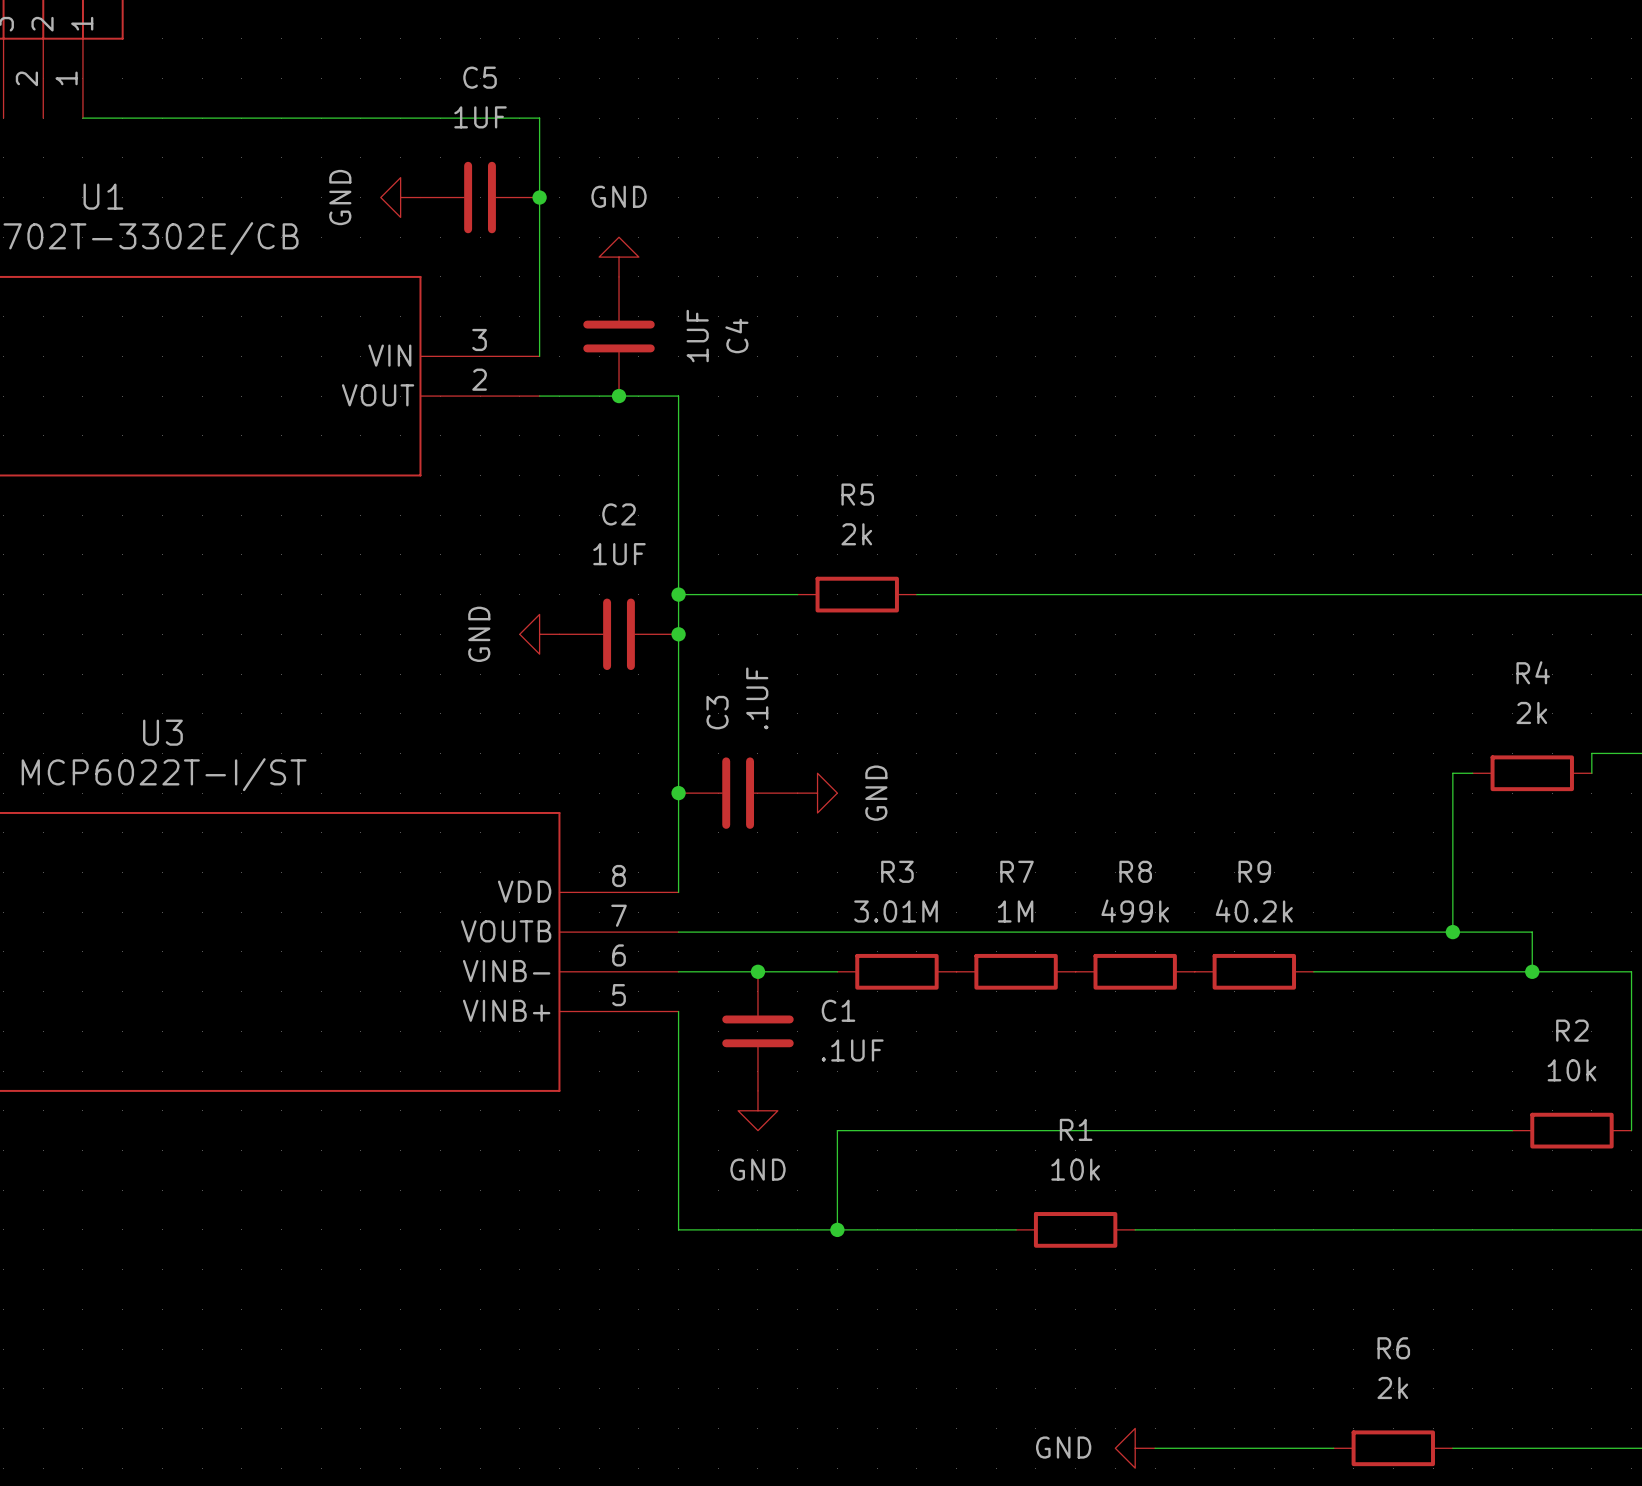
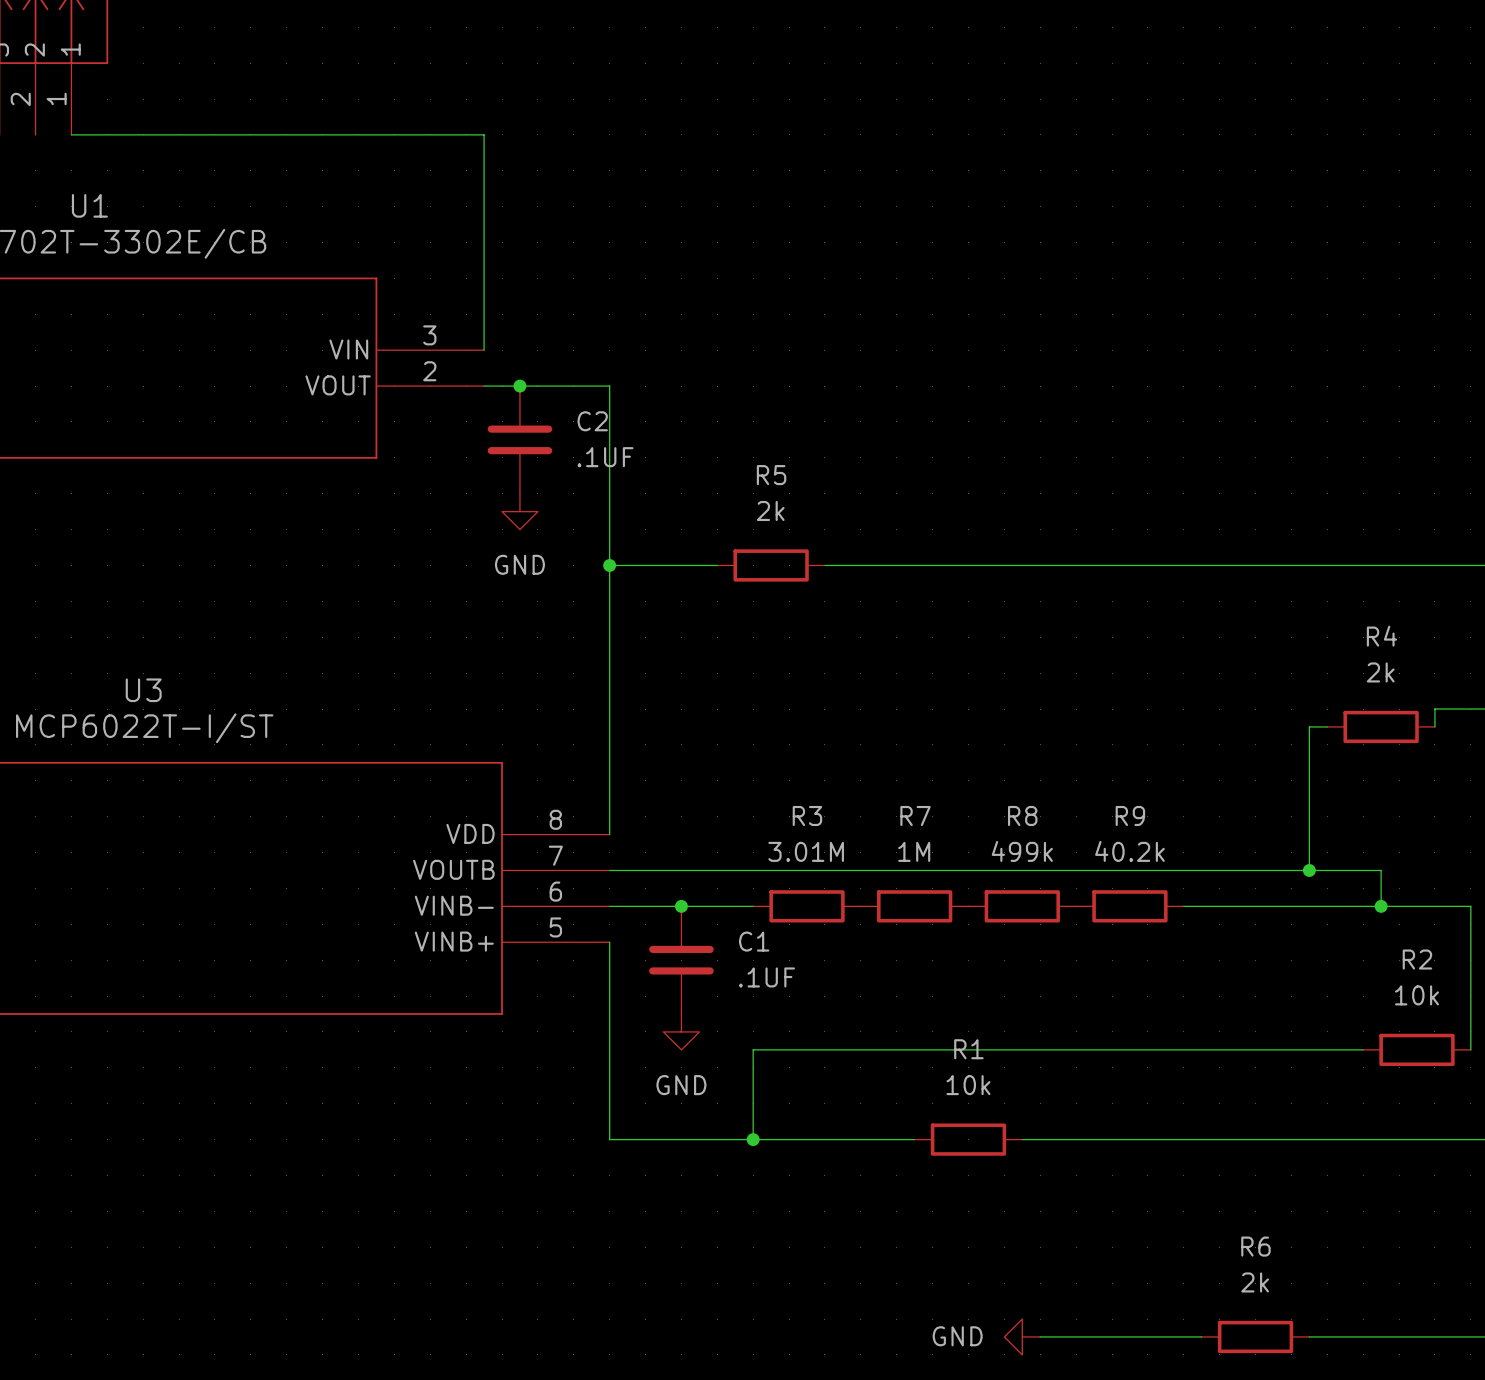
power symbol: GND (400, 197) -> none
C5: 1UF (480, 197) -> none
junction: (539, 197) -> none
power symbol: GND (619, 257) -> none
C4: 1UF (619, 336) -> none
junction position: (619, 396) -> (519, 386)
C2 name position: C2 (619, 514) -> C2 (592, 421)
C2 value: 1UF (619, 554) -> .1UF (605, 457)
power symbol rotation: 0° (539, 634) -> 90° counterclockwise (519, 511)
power symbol position: GND (539, 634) -> GND (519, 511)
C2 rotation: 0° (619, 634) -> 90° clockwise (519, 439)
C2 position: (619, 634) -> (519, 439)
junction: (678, 634) -> none
junction: (678, 793) -> none
C3: .1UF (738, 793) -> none
power symbol: GND (817, 793) -> none

